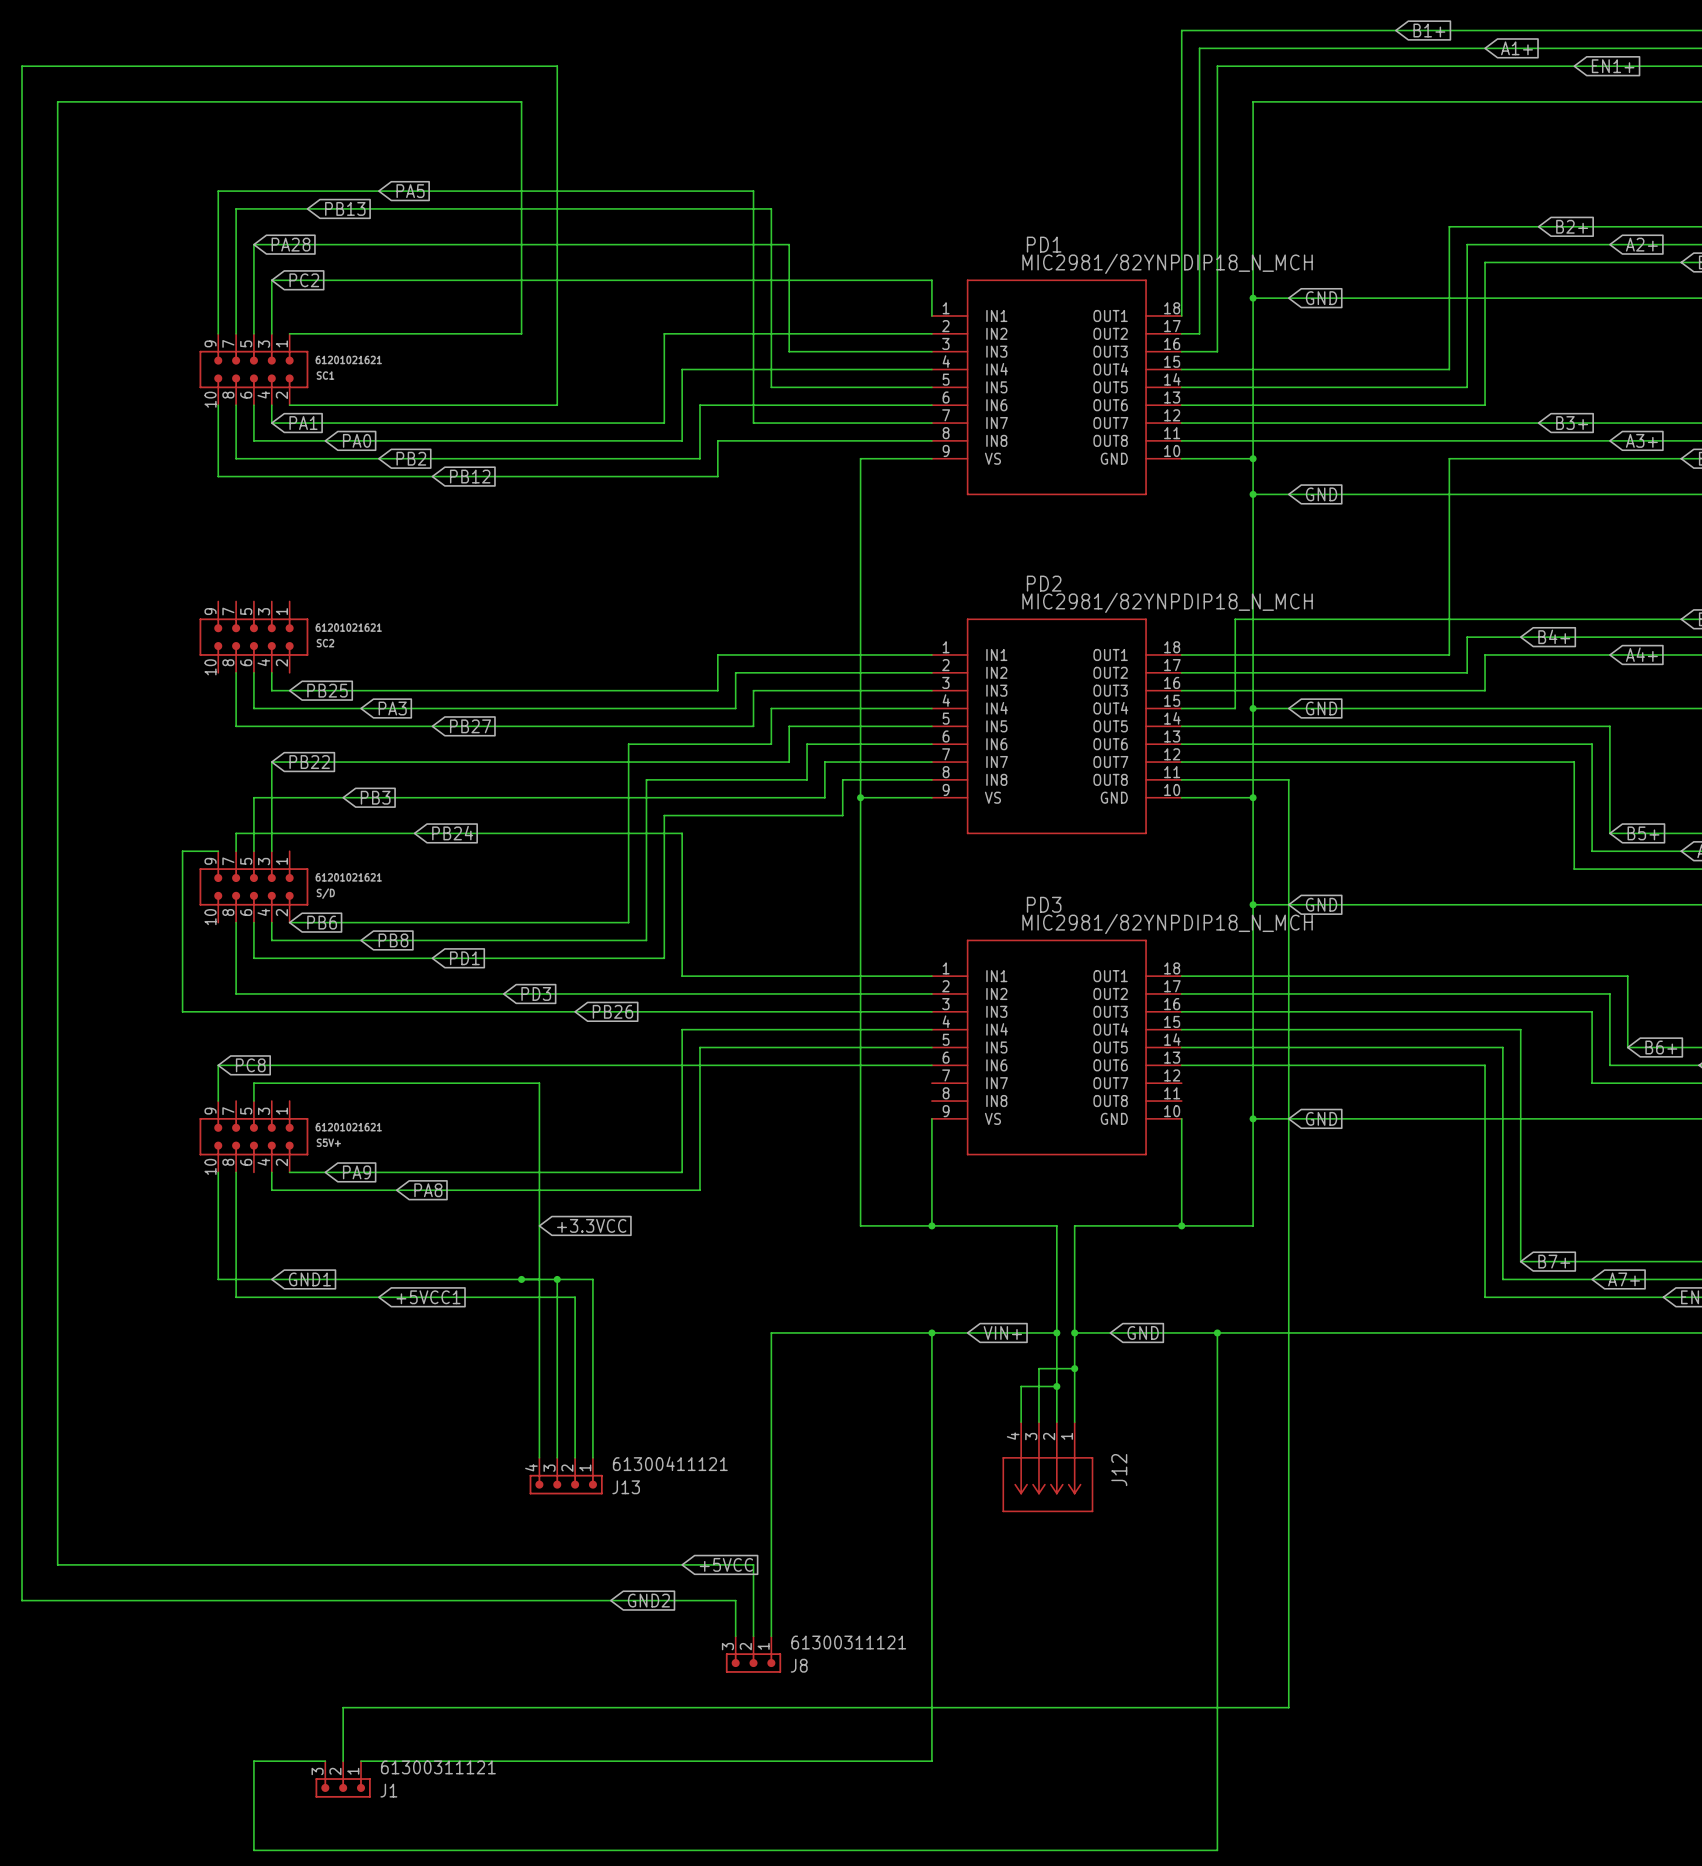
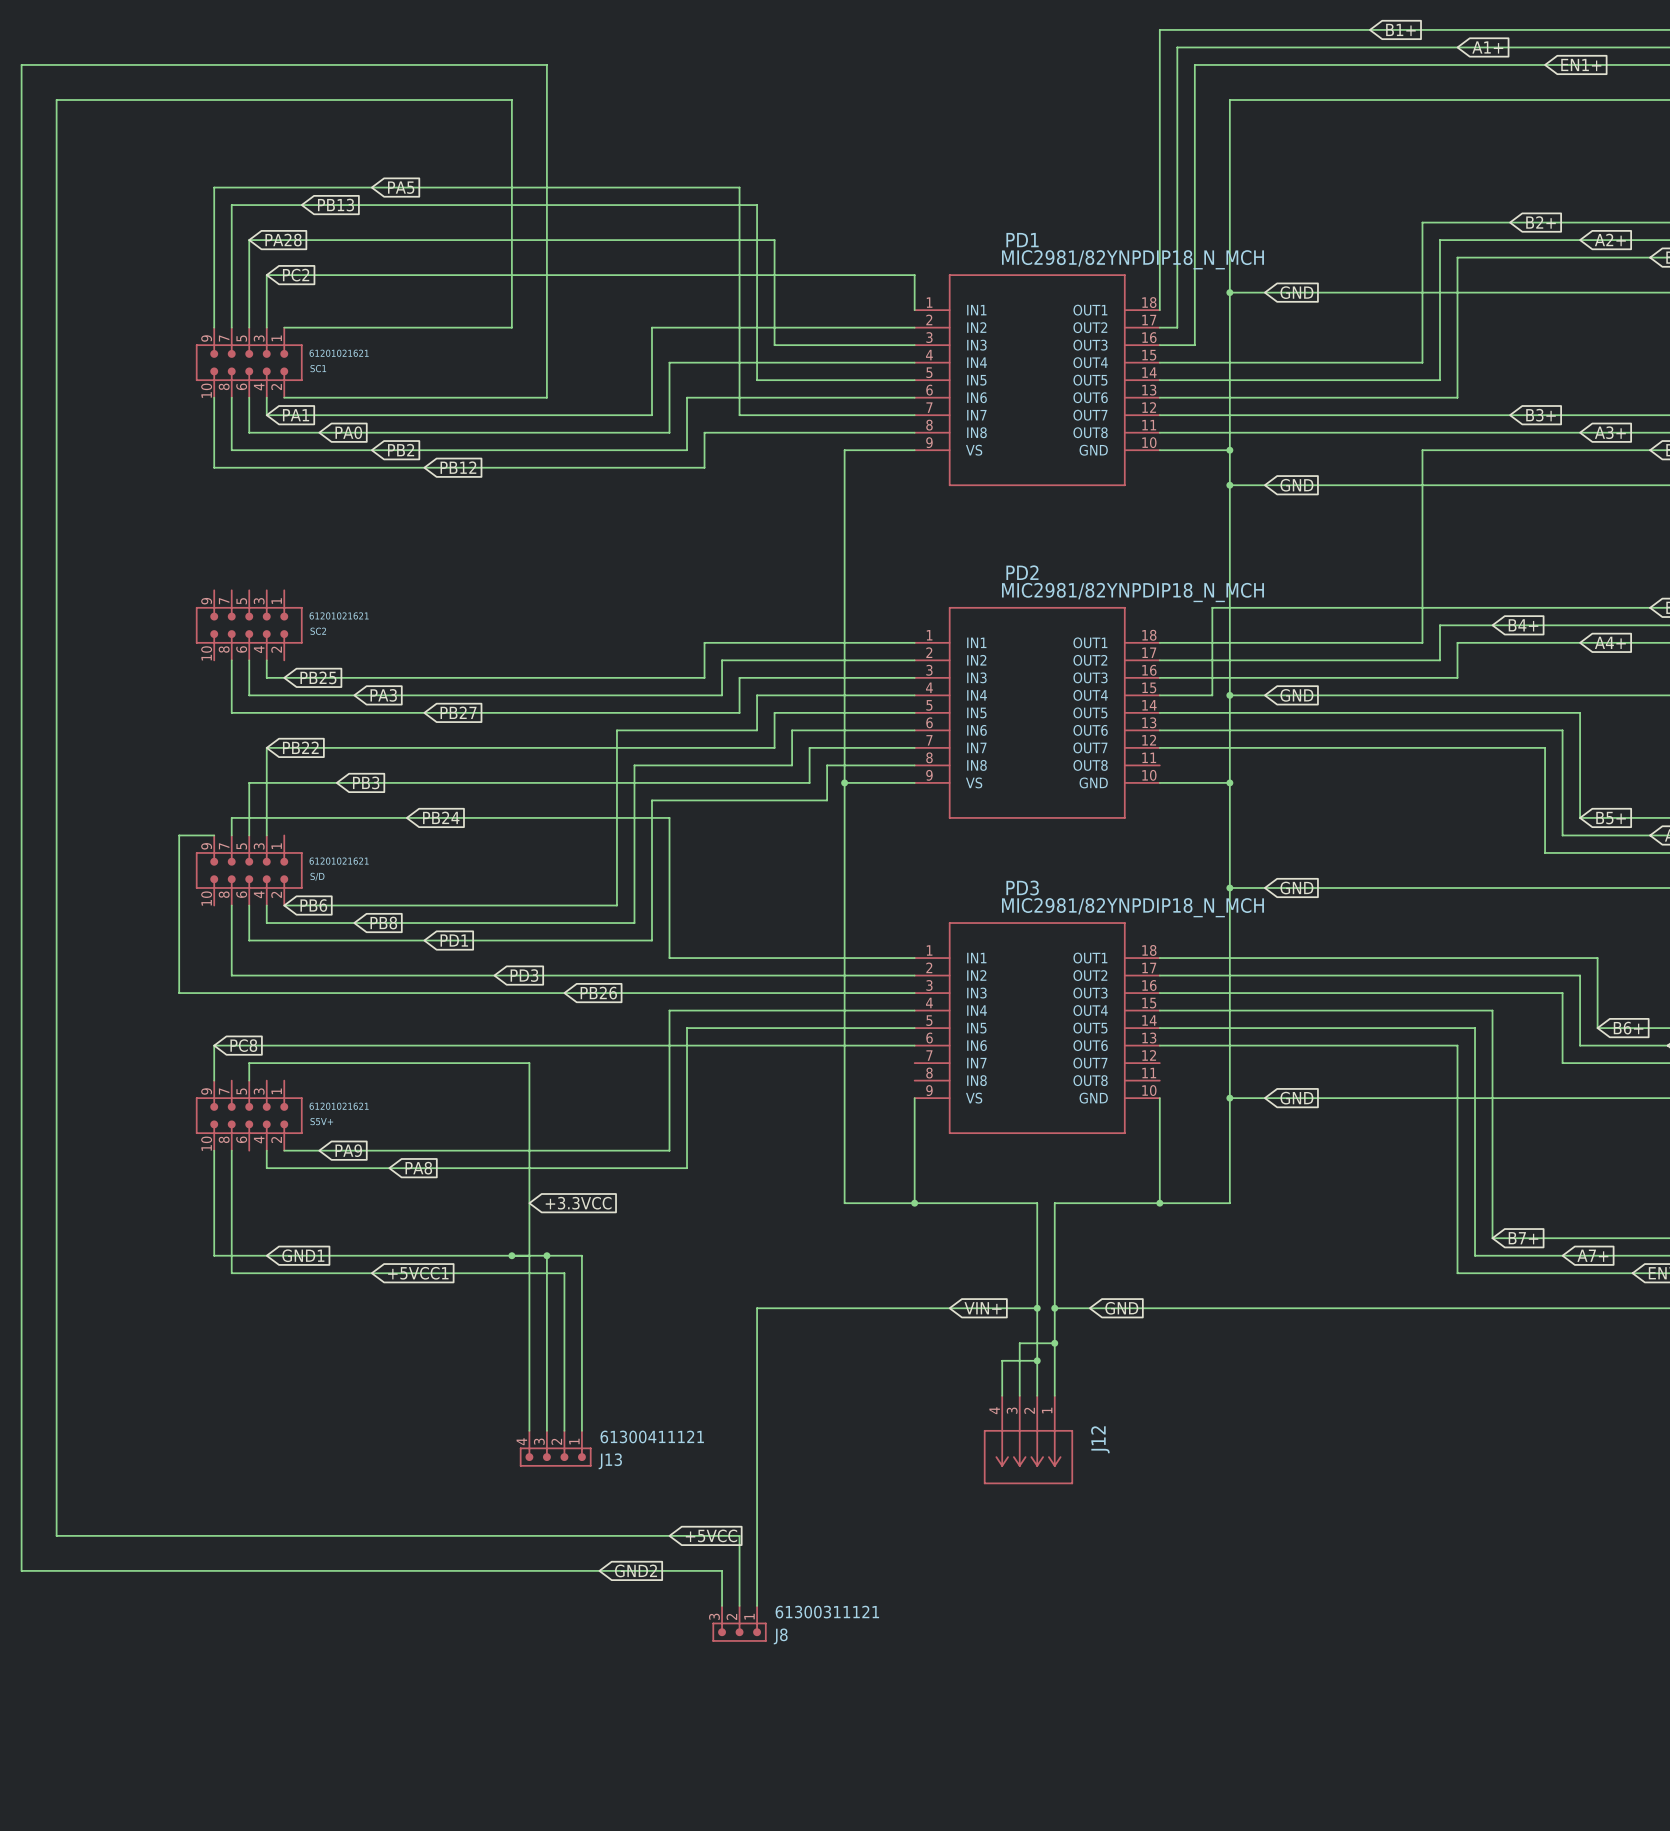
wire: (1181, 779) (1288, 779) (1288, 1707) (343, 1707) (343, 1761) -> none
wire: (931, 1332) (931, 1761) (360, 1761) -> none
junction: (931, 1332) -> none
wire: (1217, 1332) (1217, 1850) (253, 1850) (253, 1761) (325, 1761) -> none
junction: (1217, 1332) -> none
J1: 61300311121 (343, 1779) -> none

